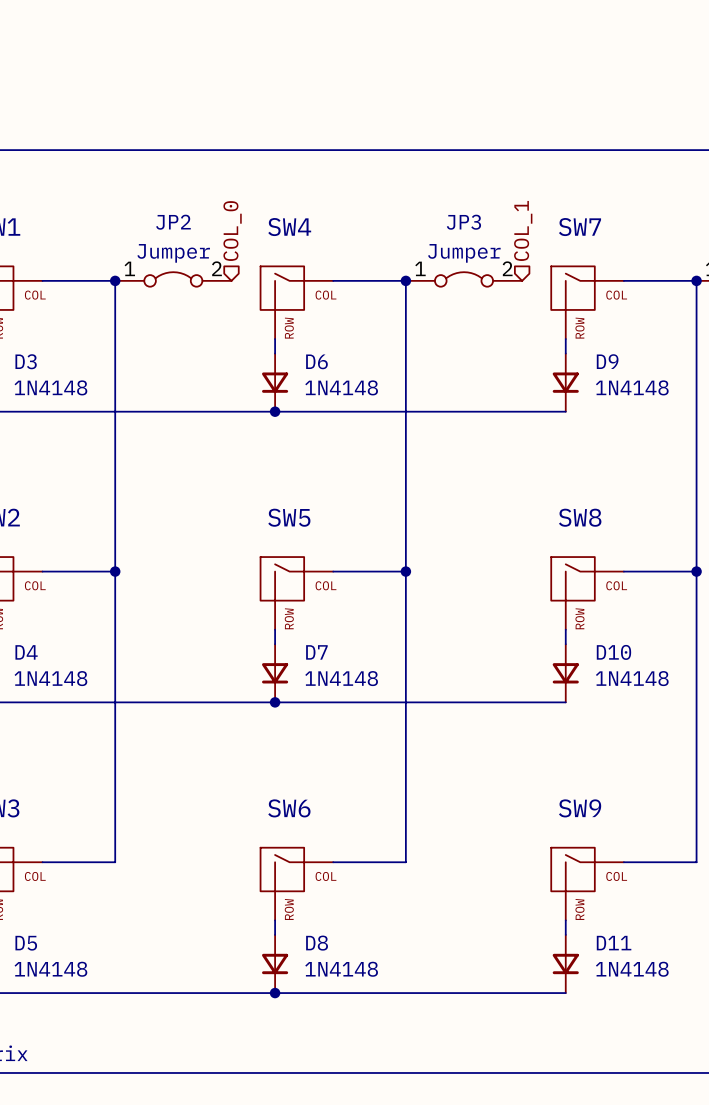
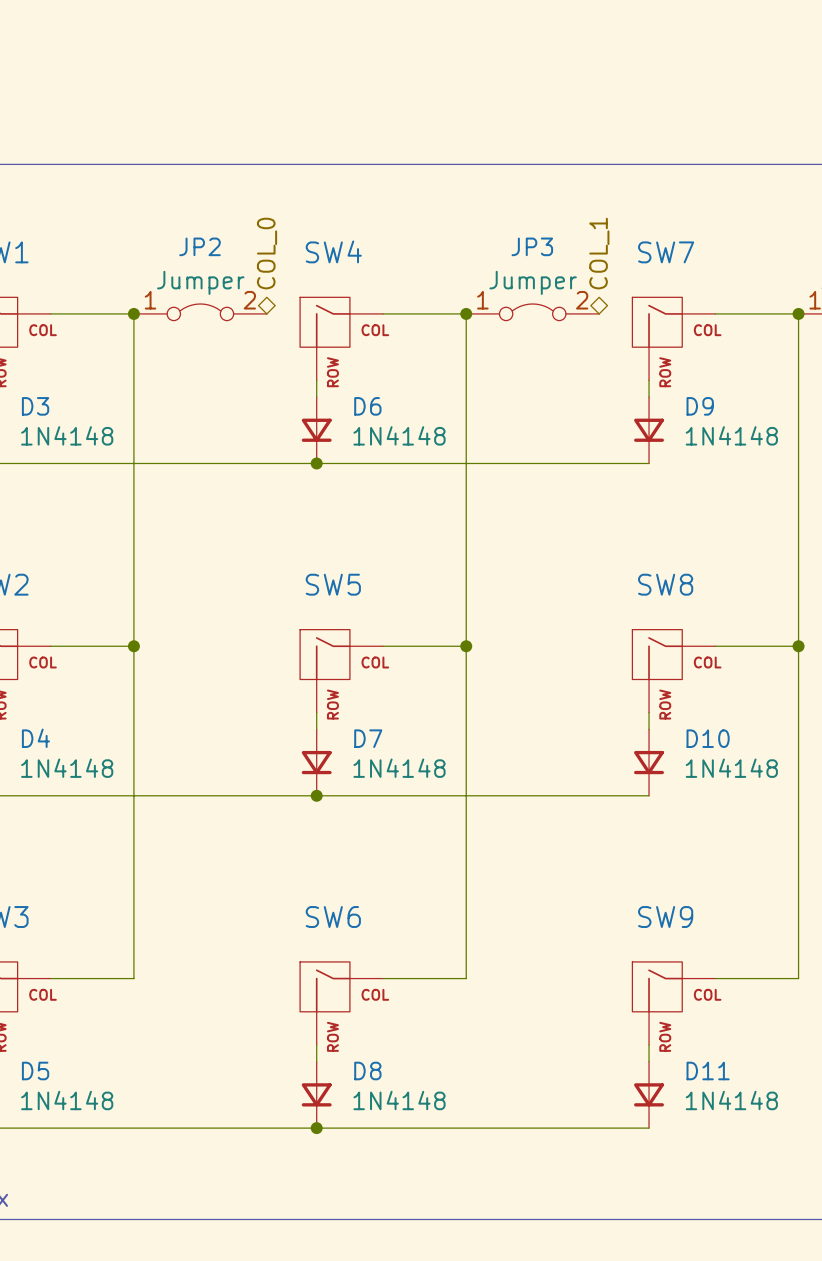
hierarchical label shape: input (523, 230) -> bidirectional (599, 253)
hierarchical label shape: input (232, 231) -> bidirectional (267, 253)

